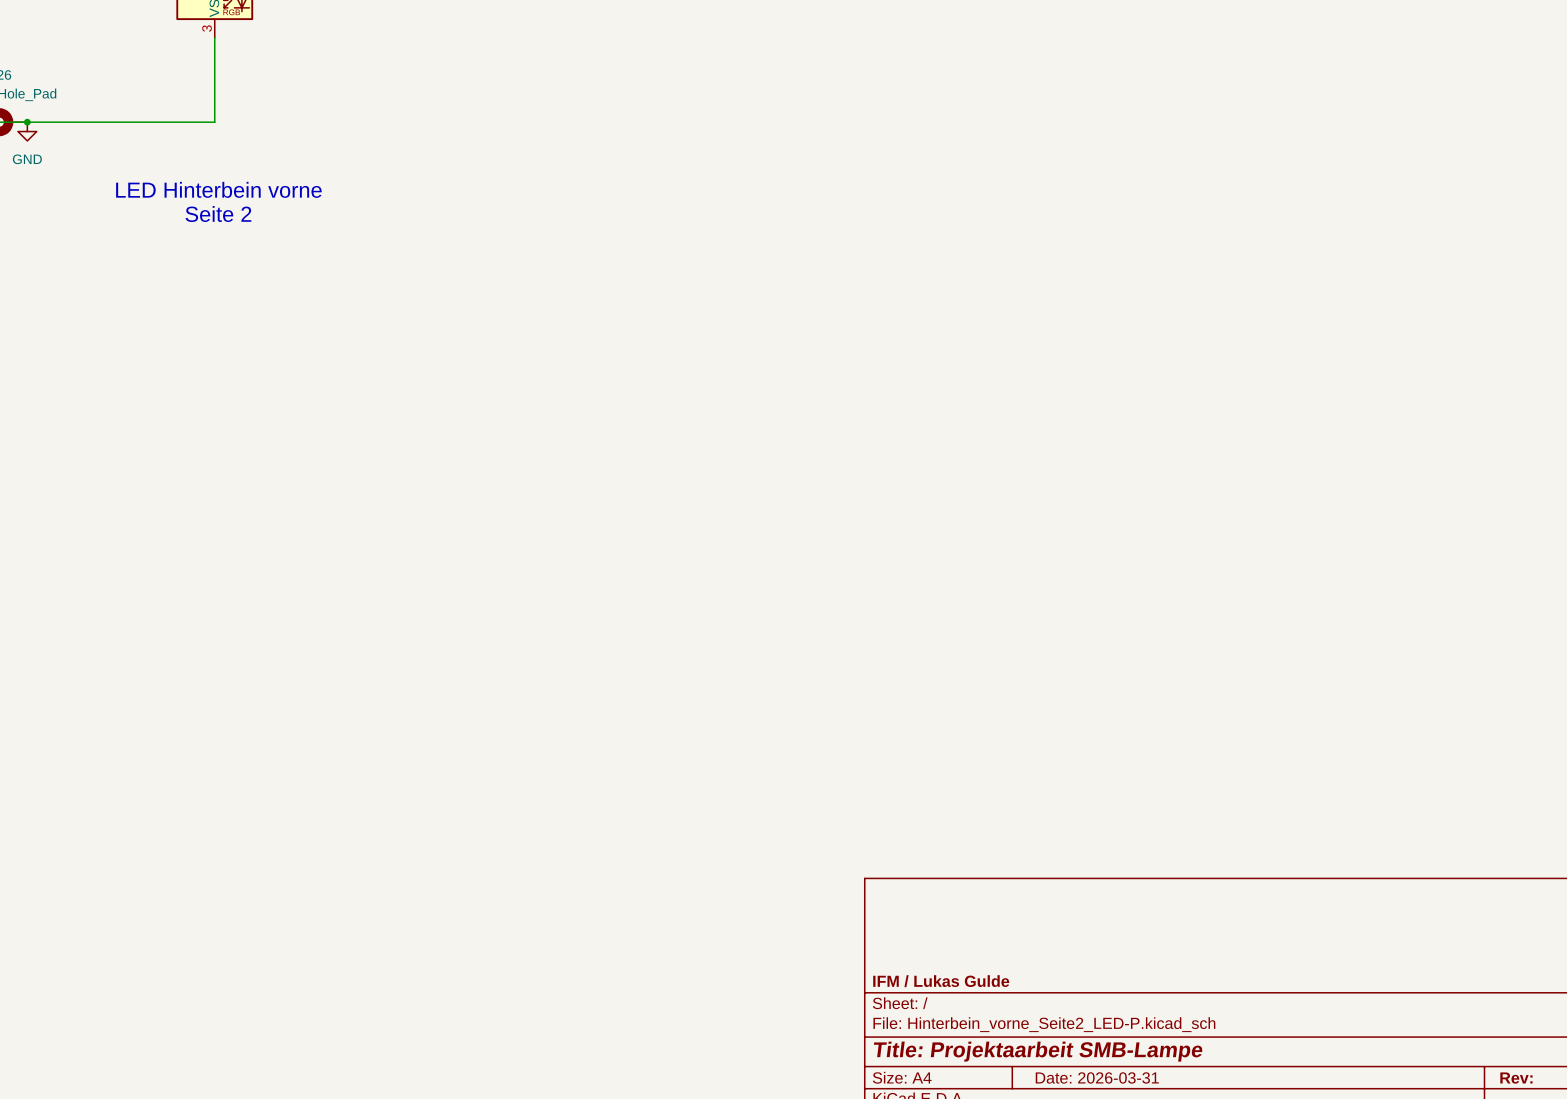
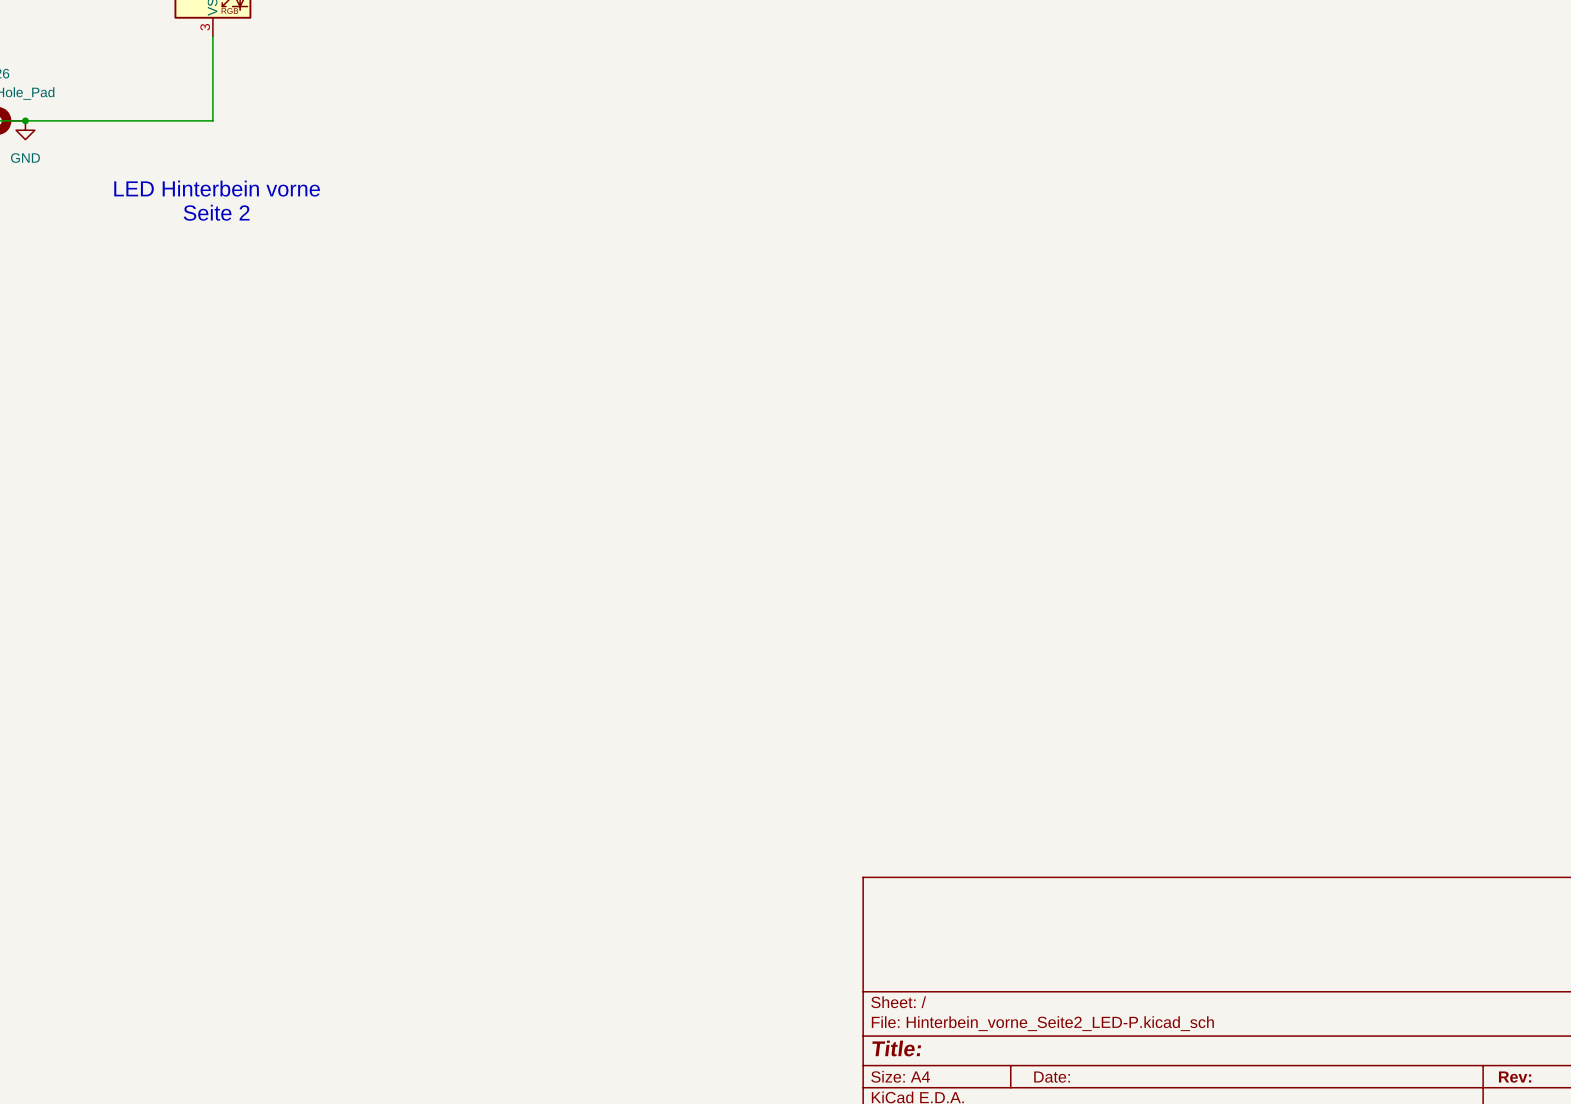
title block: IFM / Lukas Gulde (941, 981) -> none
title block: Title: Projektaarbeit SMB-Lampe (1038, 1051) -> Title: (896, 1048)
title block: Date: 2026-03-31 (1097, 1077) -> Date: (1052, 1077)

